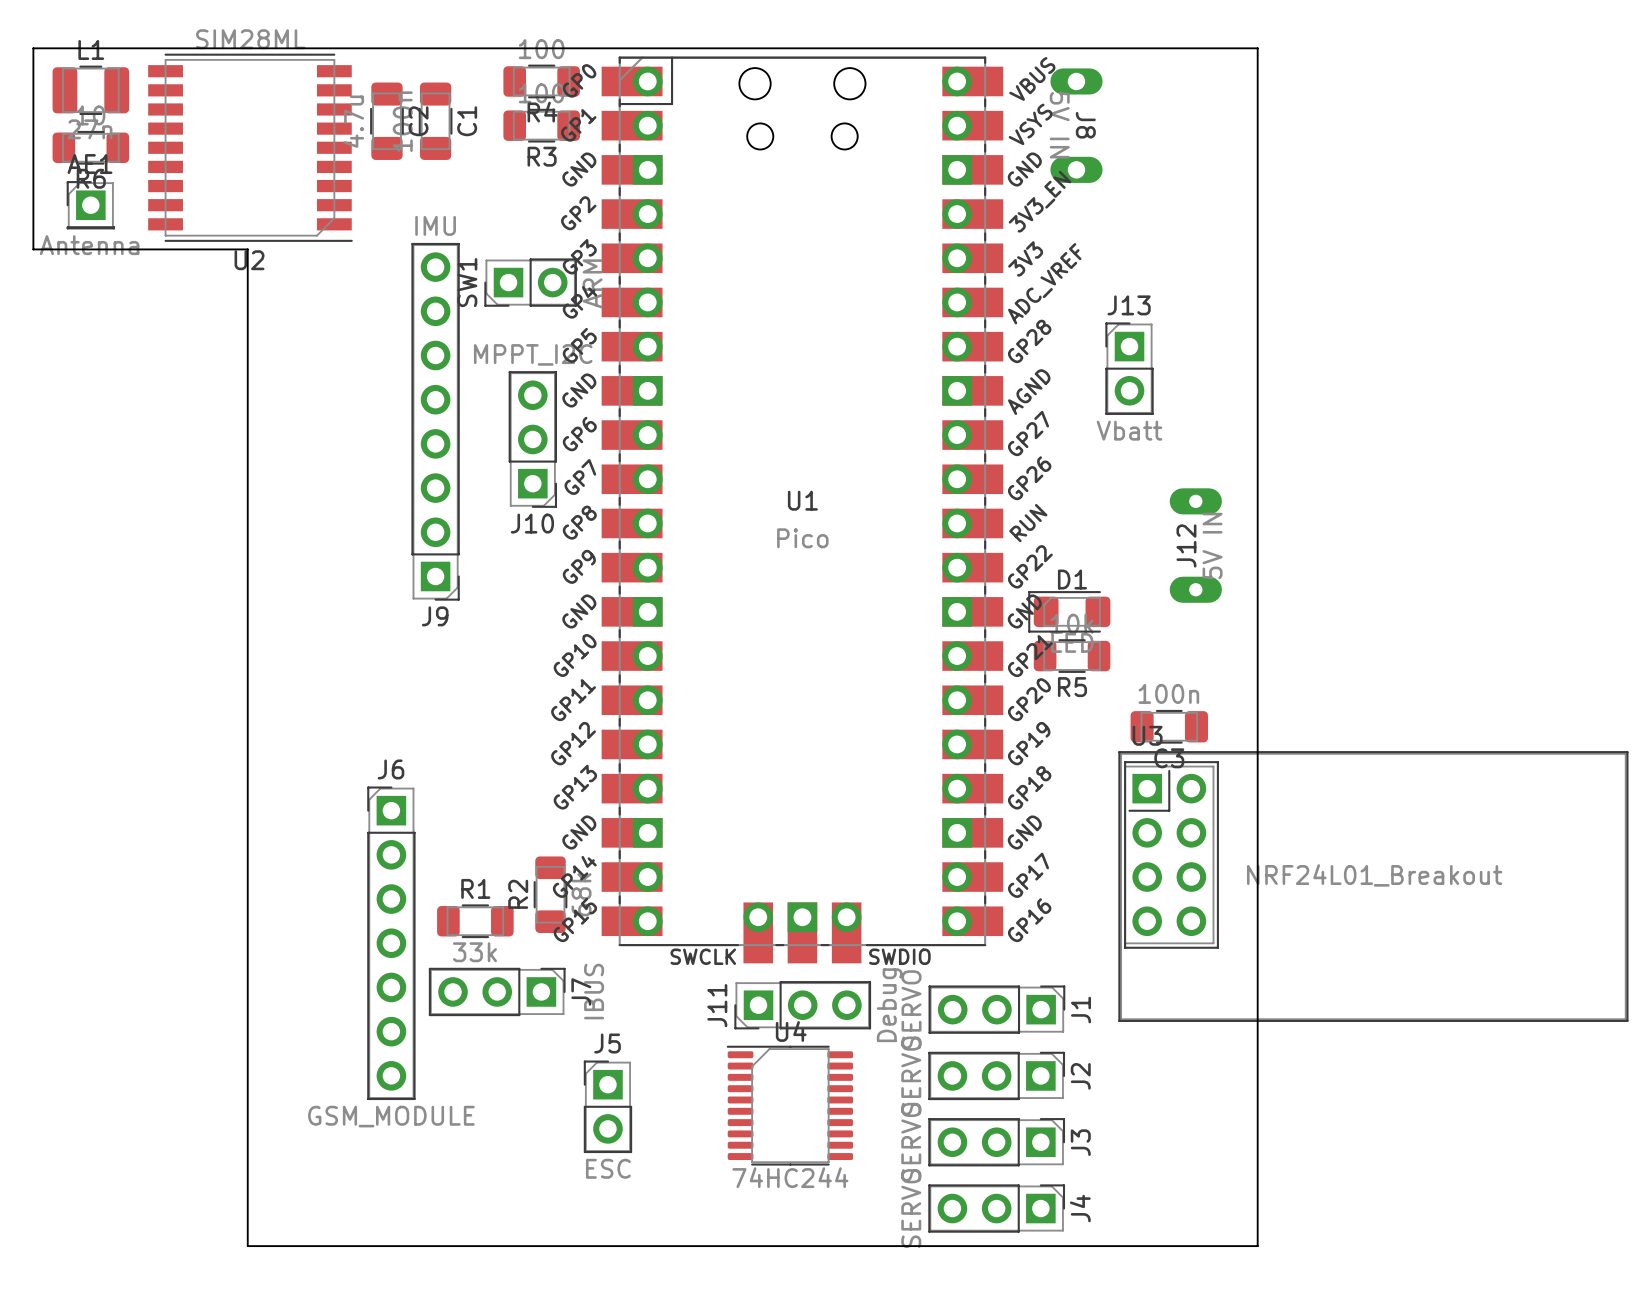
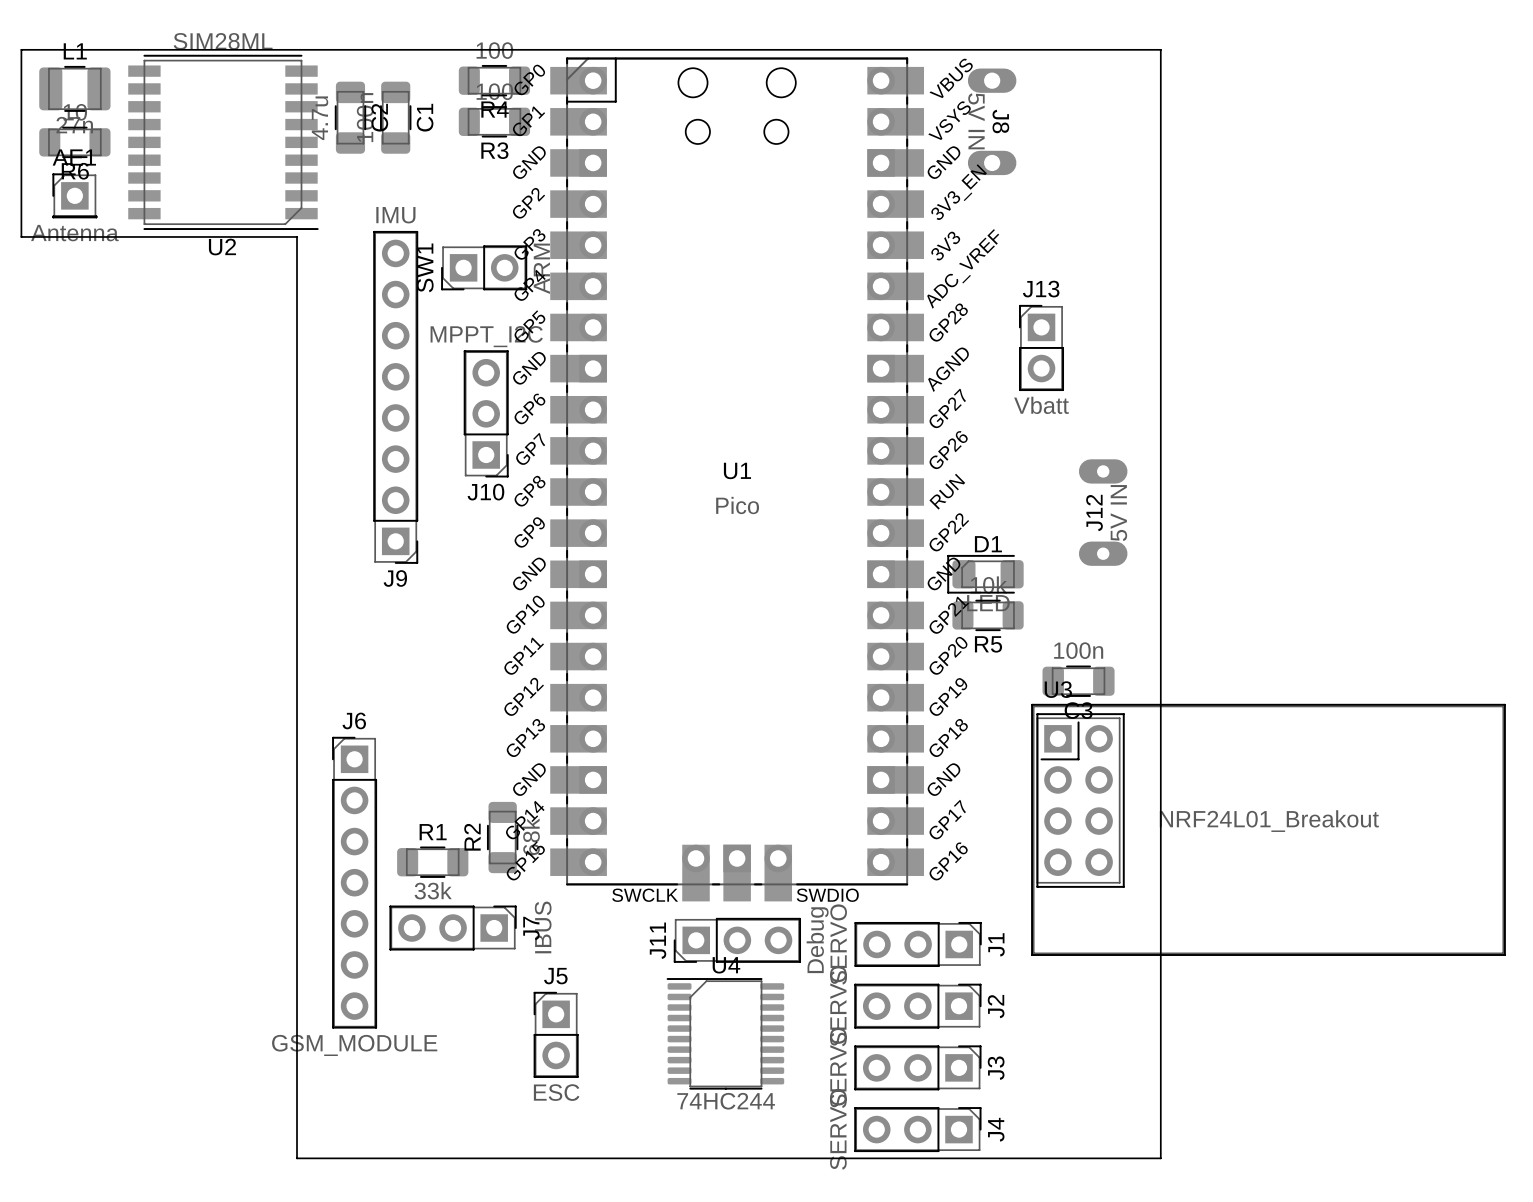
board edge: (247, 249) (247, 1246) (1257, 1246) (1257, 1239) -> (220, 236) (297, 236) (297, 1158) (1160, 1158)

